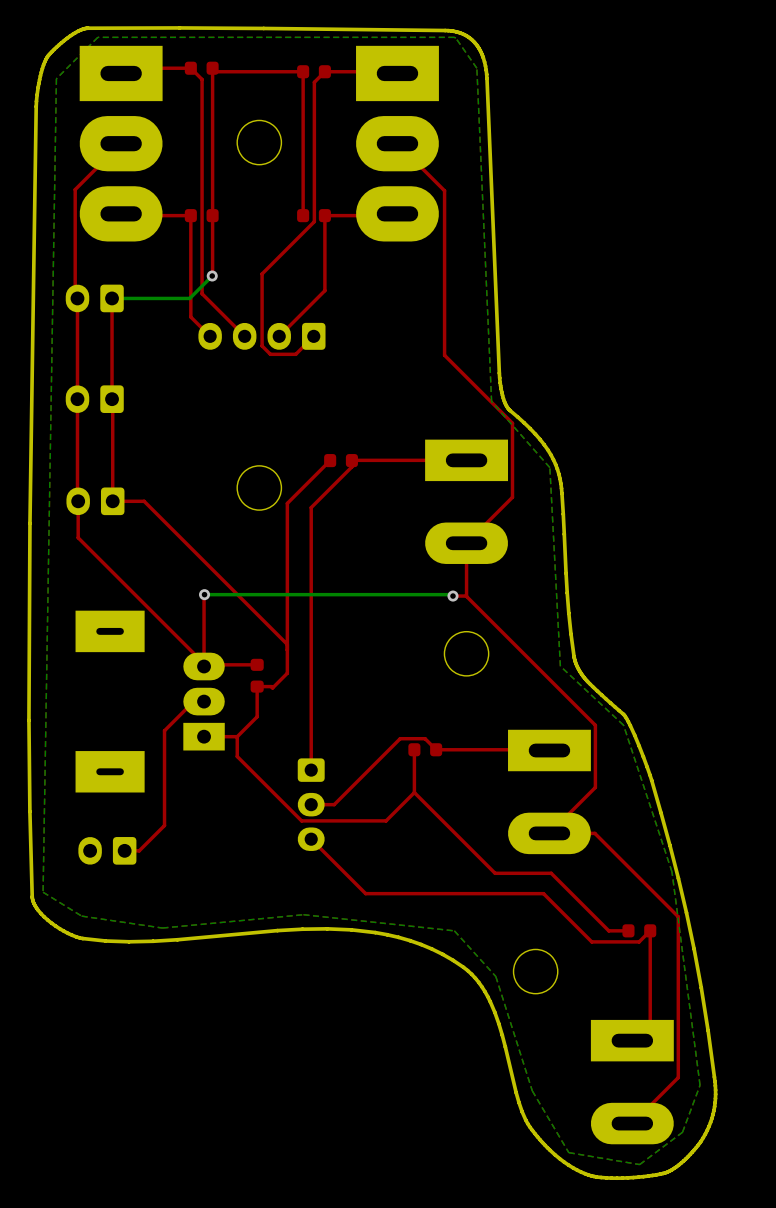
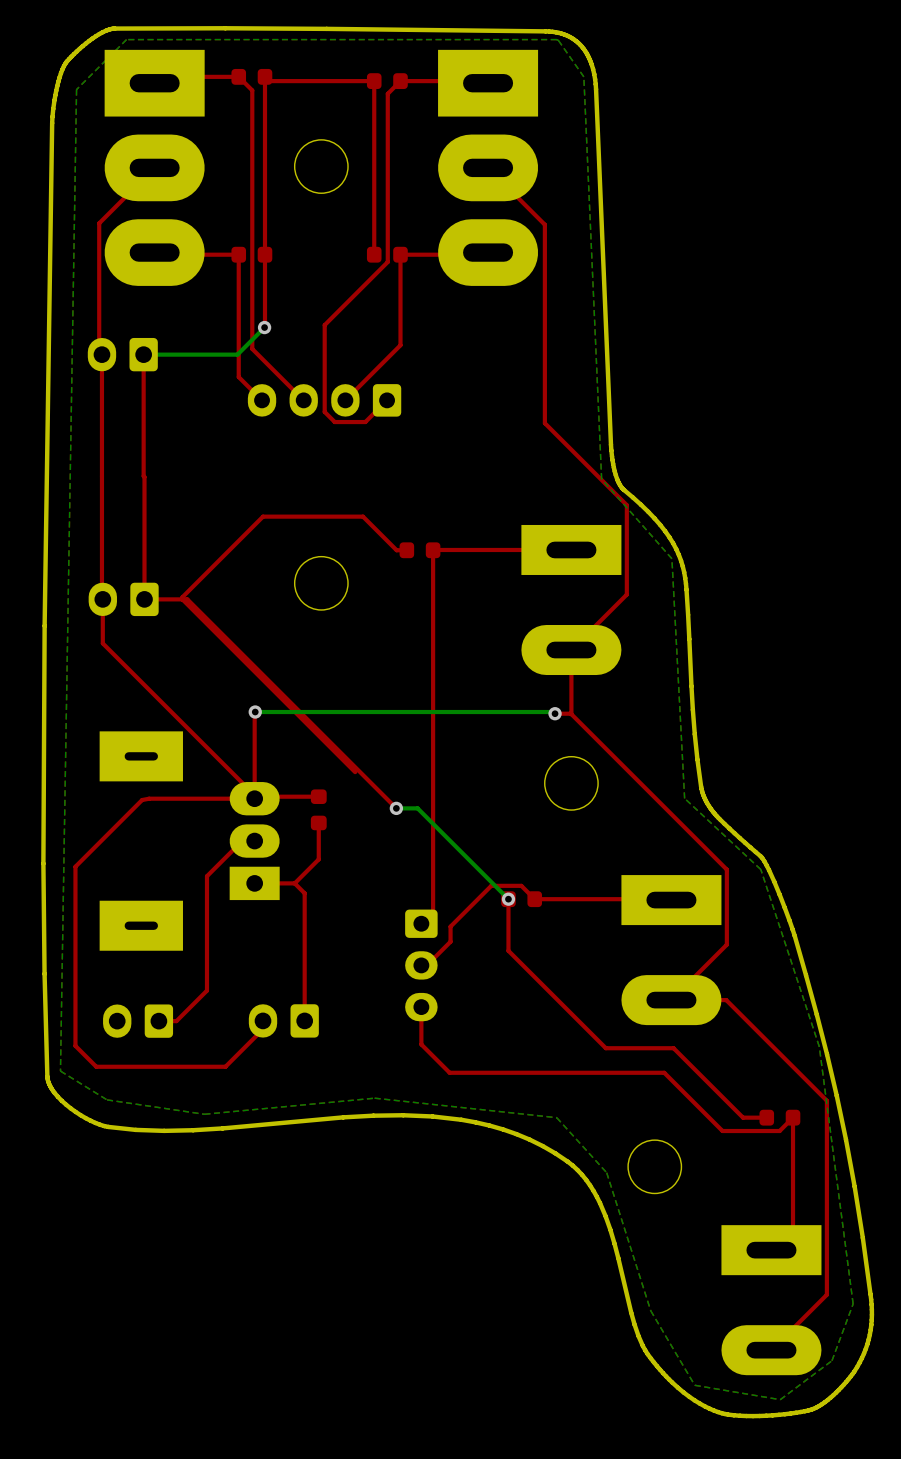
part: (94, 399) -> none
top track: (330, 460) (287, 503) (287, 673) (272, 688) (257, 686) -> (406, 550) (396, 550) (363, 516) (263, 516) (182, 597) (182, 599) (187, 599) (396, 808)
top track: (351, 466) (311, 507) (311, 770) -> (433, 557) (433, 912) (421, 923)
top track: none -> (254, 798) (142, 800) (75, 866) (75, 1045) (96, 1066) (225, 1066) (271, 1020)
bottom track: none -> (396, 808) (417, 808) (508, 899)
via: none -> (396, 808)
top track: (237, 736) (237, 756) (301, 820) (386, 820) (414, 792) -> (294, 883) (304, 893) (304, 1020)
via: none -> (508, 899)
top track: (366, 772) (334, 804) (311, 804) -> (450, 926) (450, 941) (426, 965) (421, 965)
part position: (311, 804) -> (421, 965)
top track: (311, 839) (342, 870) -> (421, 1007) (421, 1044)
part: none -> (283, 1020)

